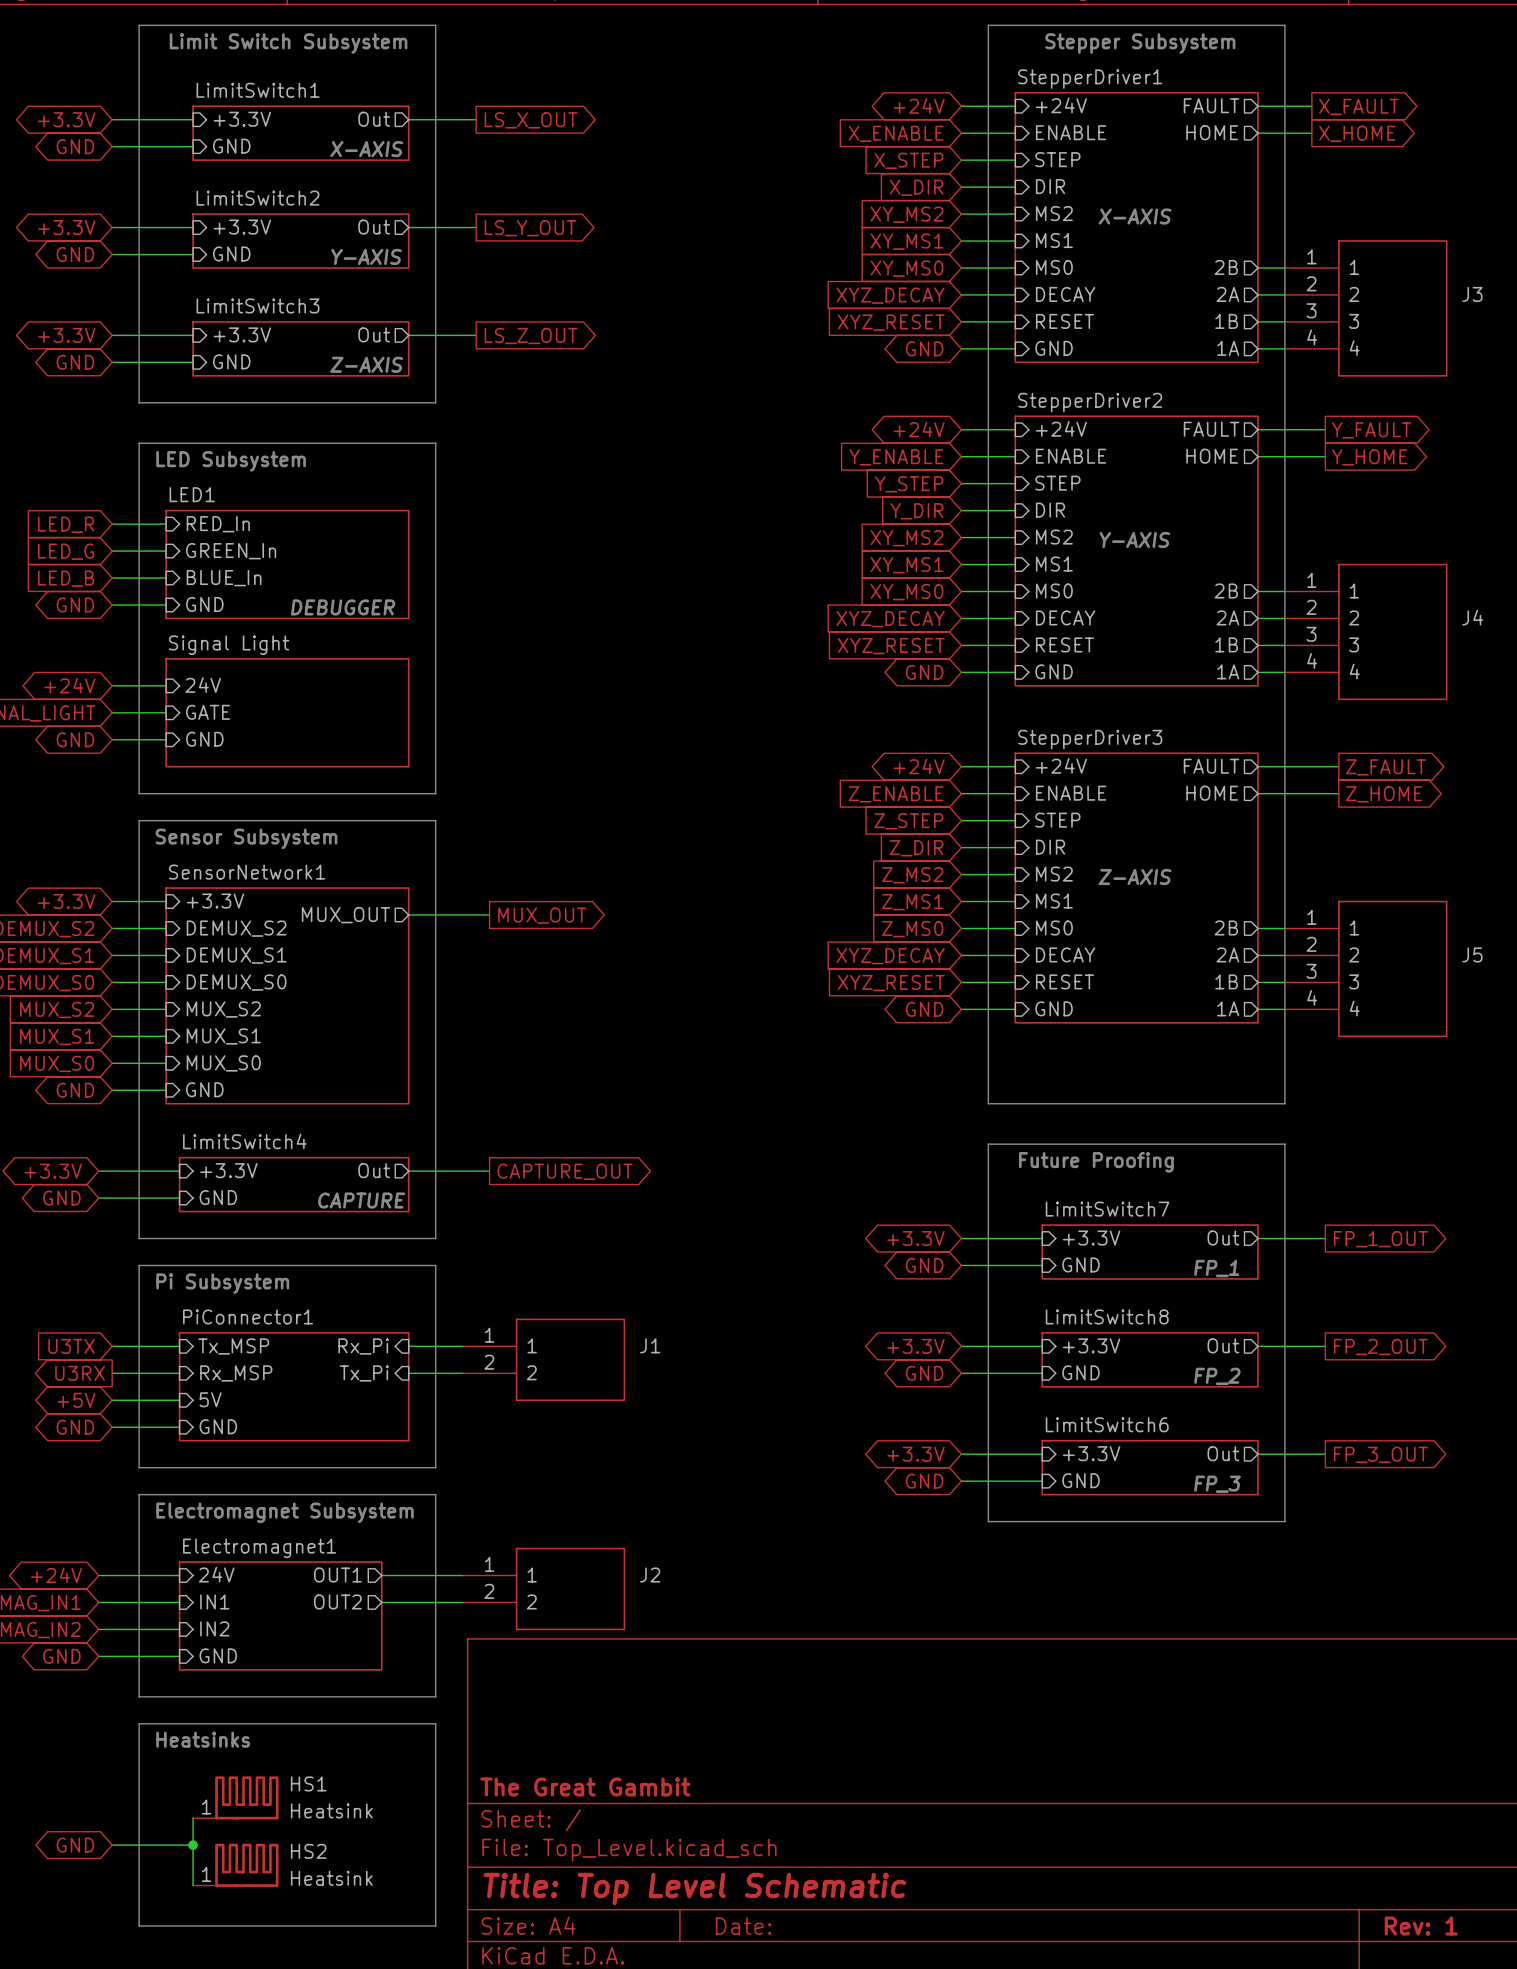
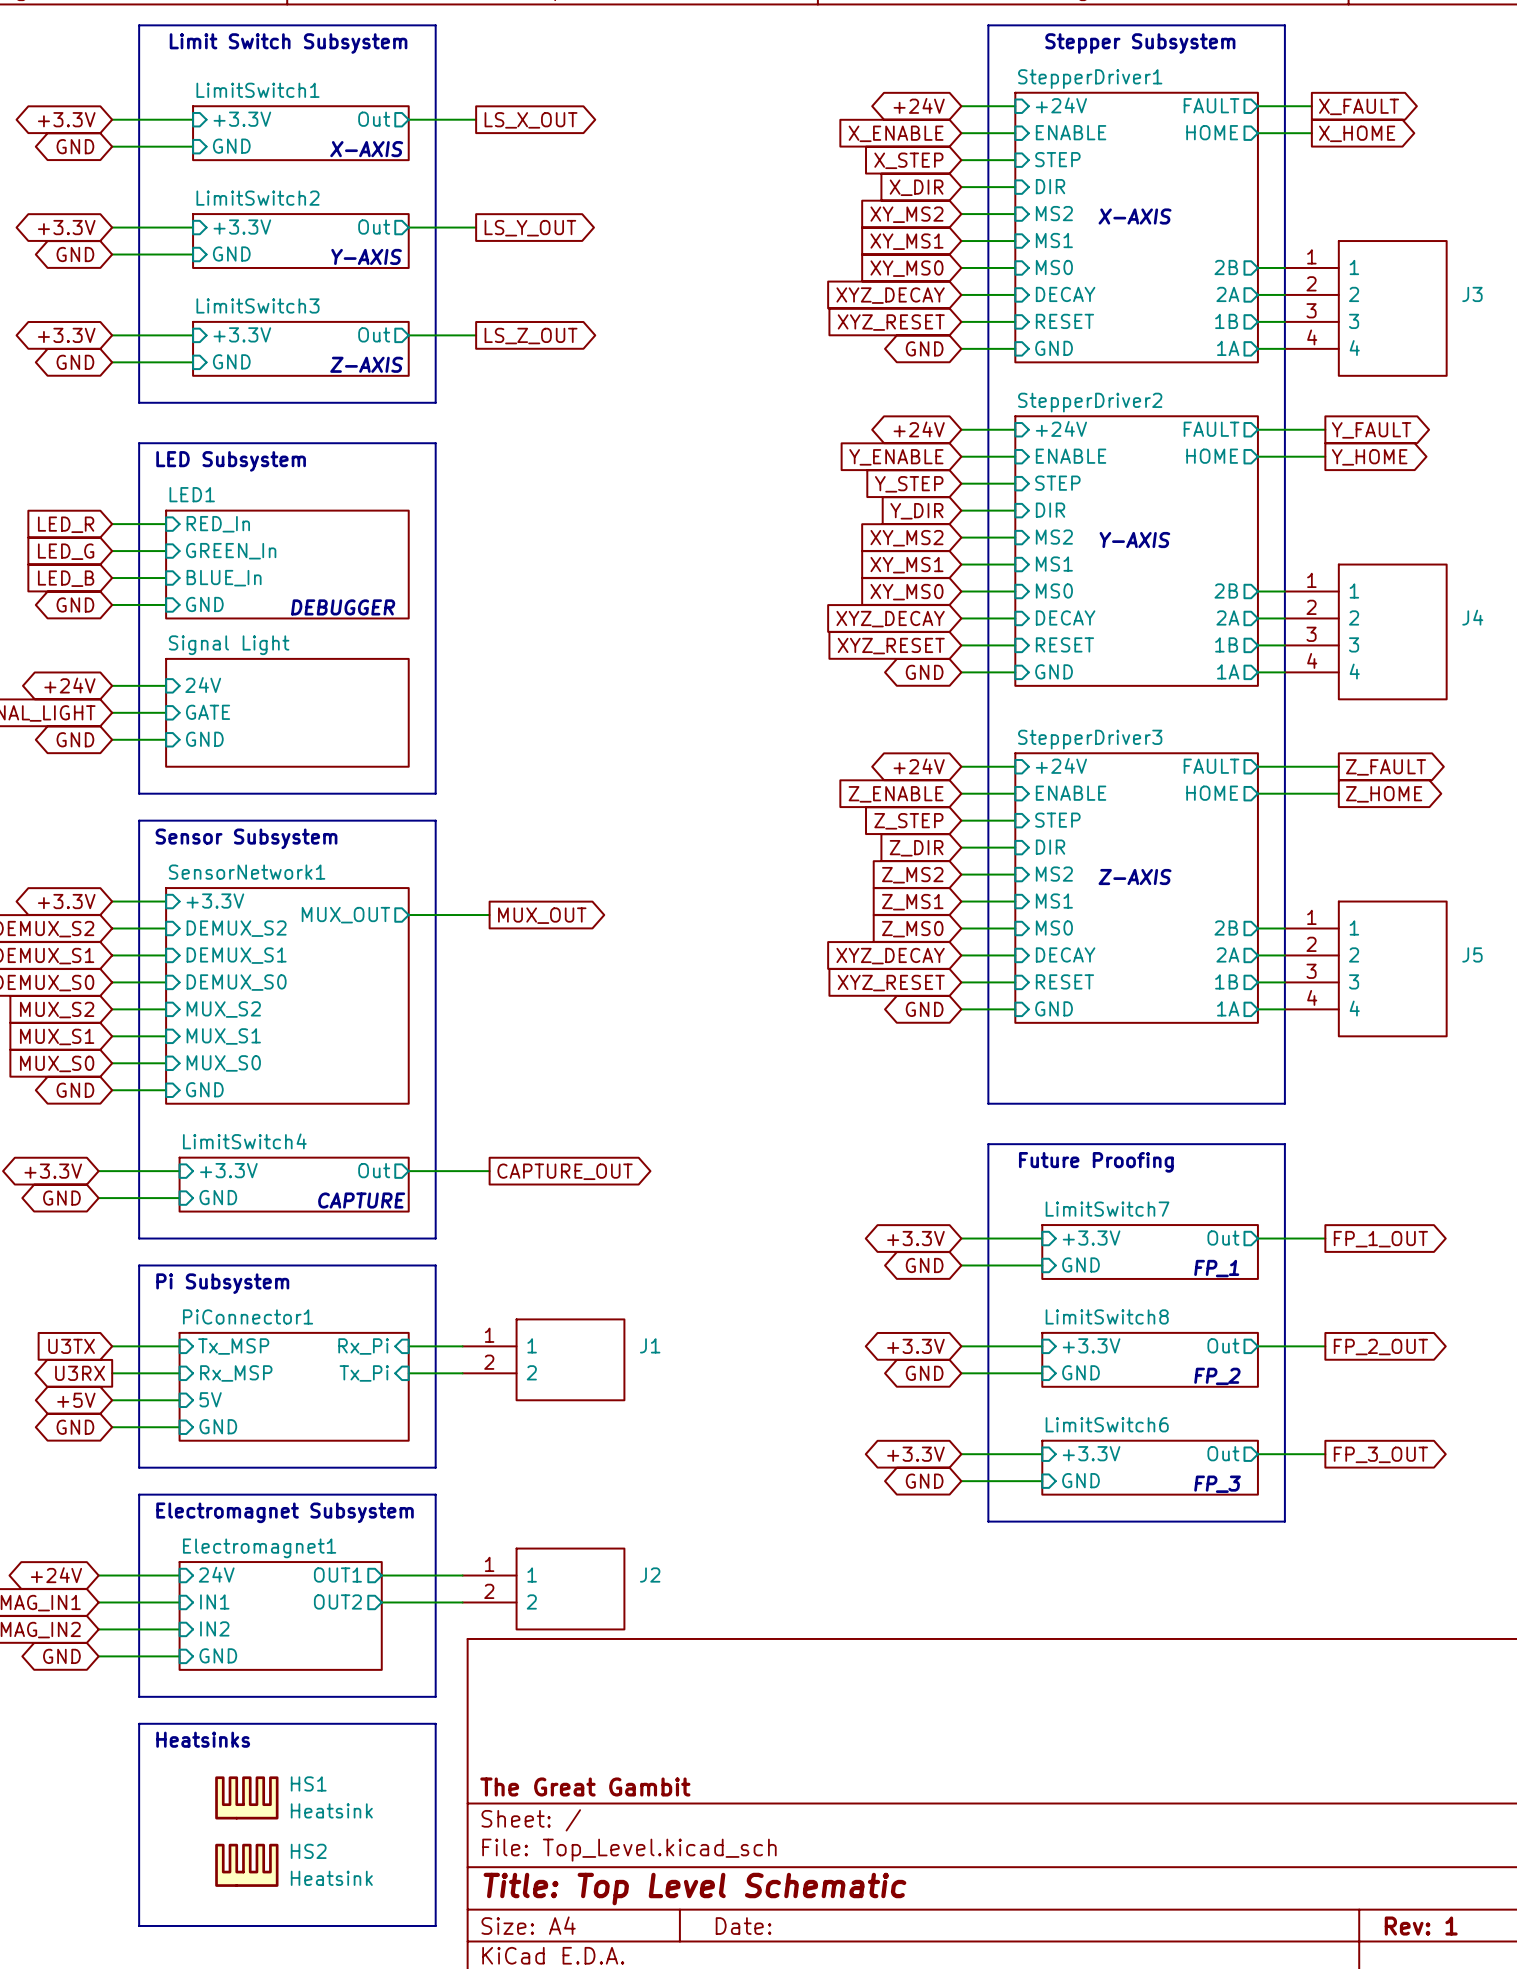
HS1 symbol: [193, 1776, 279, 1820] -> [215, 1776, 279, 1820]
wire: (193, 1818) (193, 1885) -> none
HS2 symbol: [193, 1843, 279, 1887] -> [215, 1843, 279, 1887]
global label: GND (75, 1845) -> none
wire: (112, 1845) (193, 1845) -> none
junction: (193, 1845) -> none

